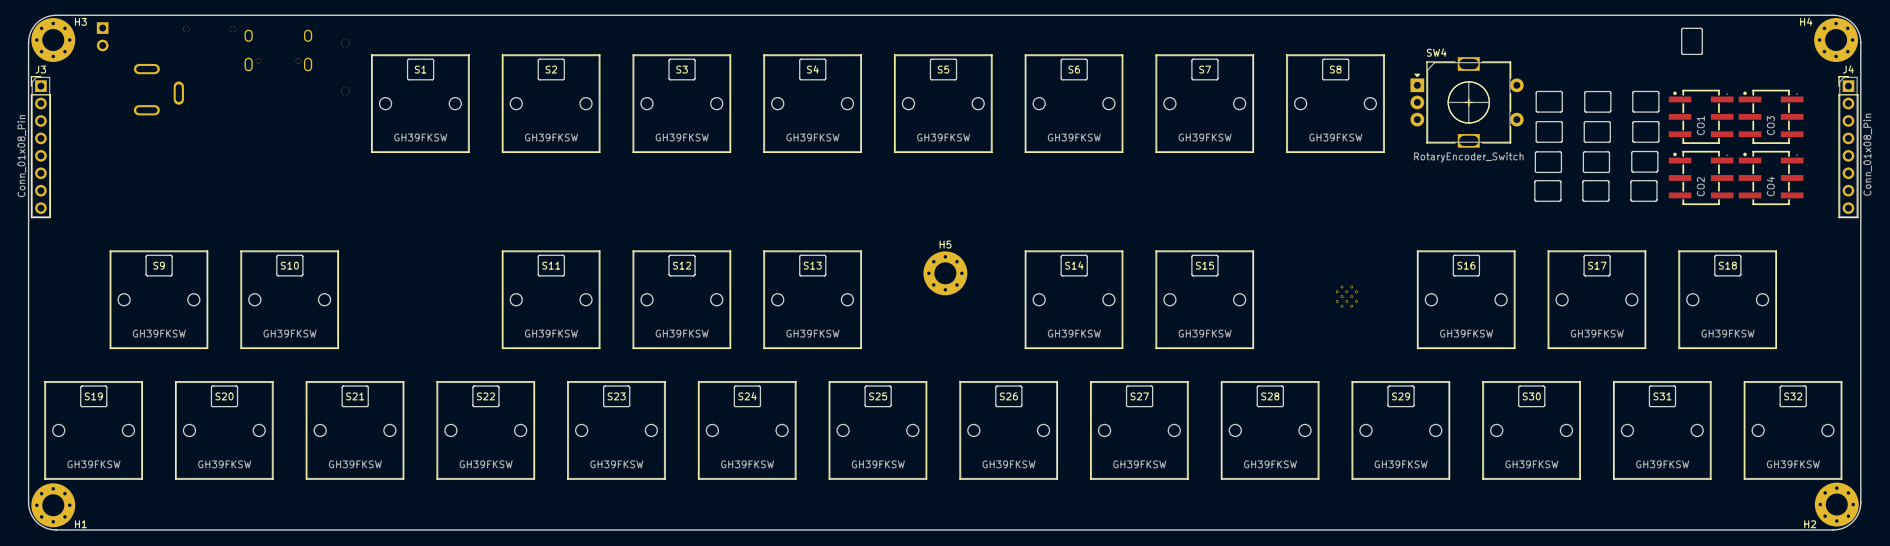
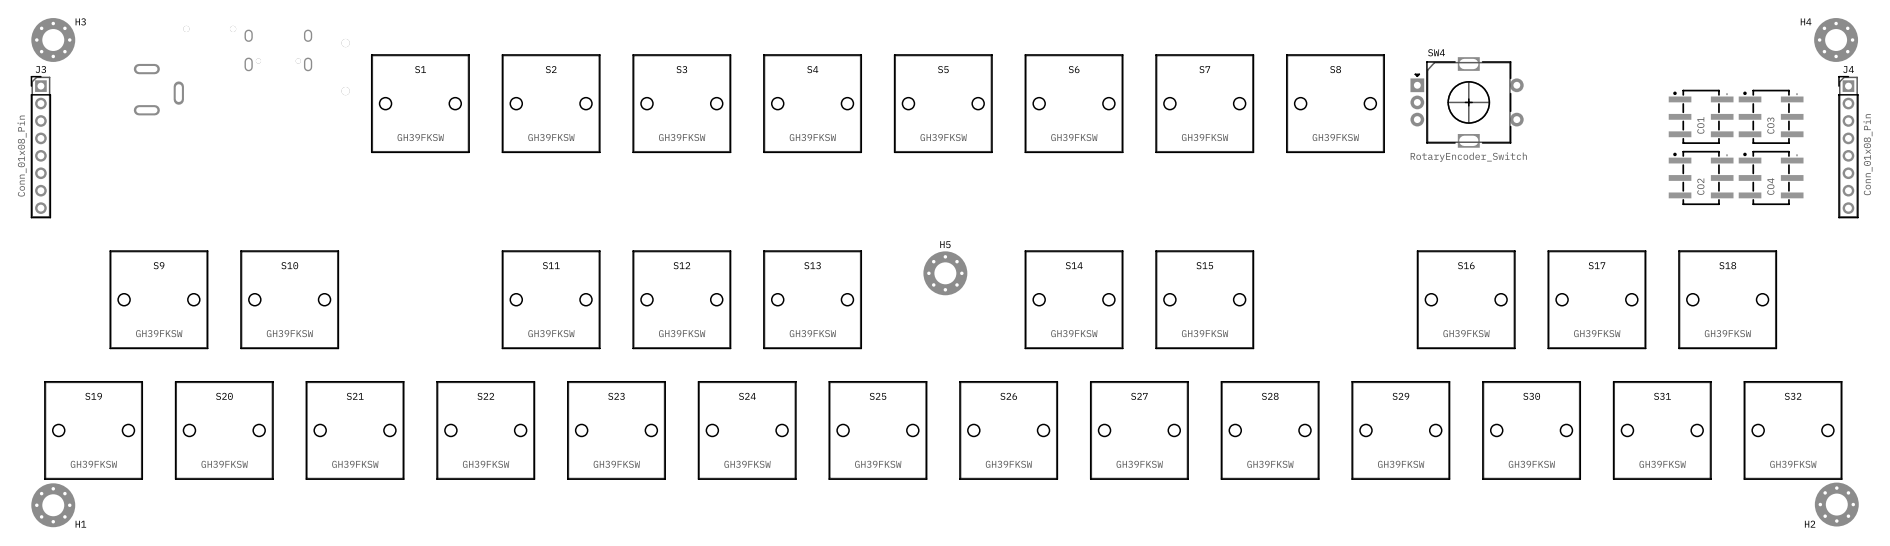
board edge: (56, 15) (1840, 16) (1855, 26) (1860, 42) (1859, 509) (1850, 524) (1833, 529) (48, 529) (34, 519) (28, 502) (28, 42) (30, 32) (36, 23) (45, 17) (56, 15) -> none
part: (102, 36) -> none
part: (1691, 41) -> none
part: (420, 69) -> none
part: (551, 69) -> none
part: (682, 69) -> none
part: (812, 69) -> none
part: (943, 69) -> none
part: (1074, 69) -> none
part: (1204, 69) -> none
part: (1335, 69) -> none
part: (1549, 101) -> none
part: (1597, 101) -> none
part: (1645, 101) -> none
part: (1549, 131) -> none
part: (1597, 131) -> none
part: (1645, 131) -> none
part: (1644, 161) -> none
part: (1548, 162) -> none
part: (1596, 162) -> none
part: (1547, 190) -> none
part: (1595, 190) -> none
part: (1643, 190) -> none
part: (159, 265) -> none
part: (289, 265) -> none
part: (551, 265) -> none
part: (682, 265) -> none
part: (812, 265) -> none
part: (1074, 265) -> none
part: (1204, 265) -> none
part: (1466, 265) -> none
part: (1597, 265) -> none
part: (1727, 265) -> none
part: (1346, 296) -> none
part: (93, 396) -> none
part: (224, 396) -> none
part: (355, 396) -> none
part: (485, 396) -> none
part: (616, 396) -> none
part: (747, 396) -> none
part: (878, 396) -> none
part: (1008, 396) -> none
part: (1139, 396) -> none
part: (1270, 396) -> none
part: (1401, 396) -> none
part: (1531, 396) -> none
part: (1662, 396) -> none
part: (1793, 396) -> none

